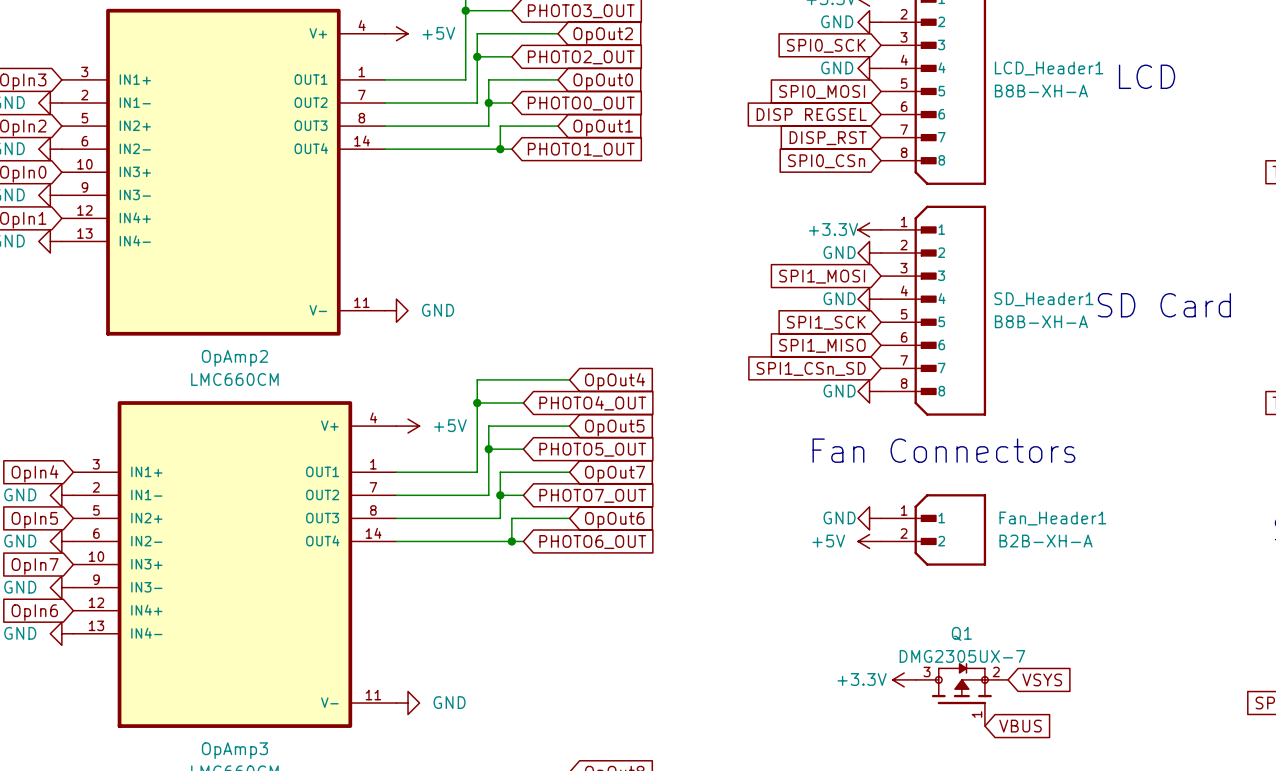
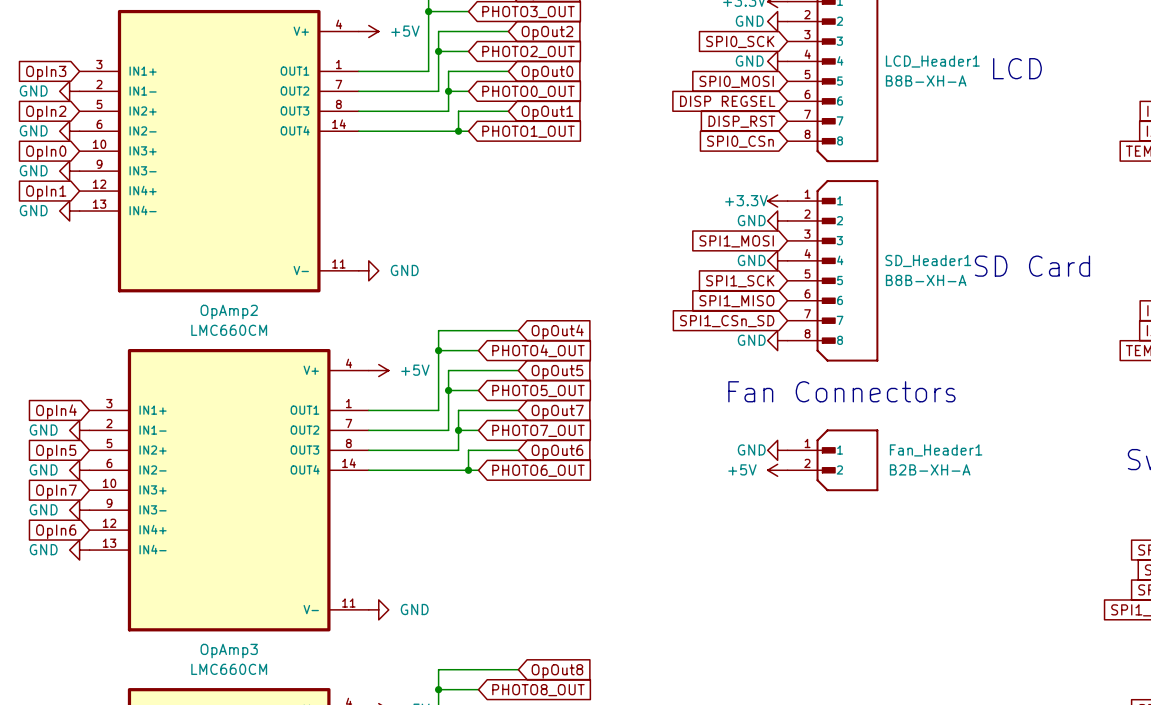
power symbol: +3.3V (904, 679) -> none
global label: VSYS (1042, 679) -> none
Q1: DMG2305UX-7 (961, 694) -> none
global label: VBUS (1020, 726) -> none

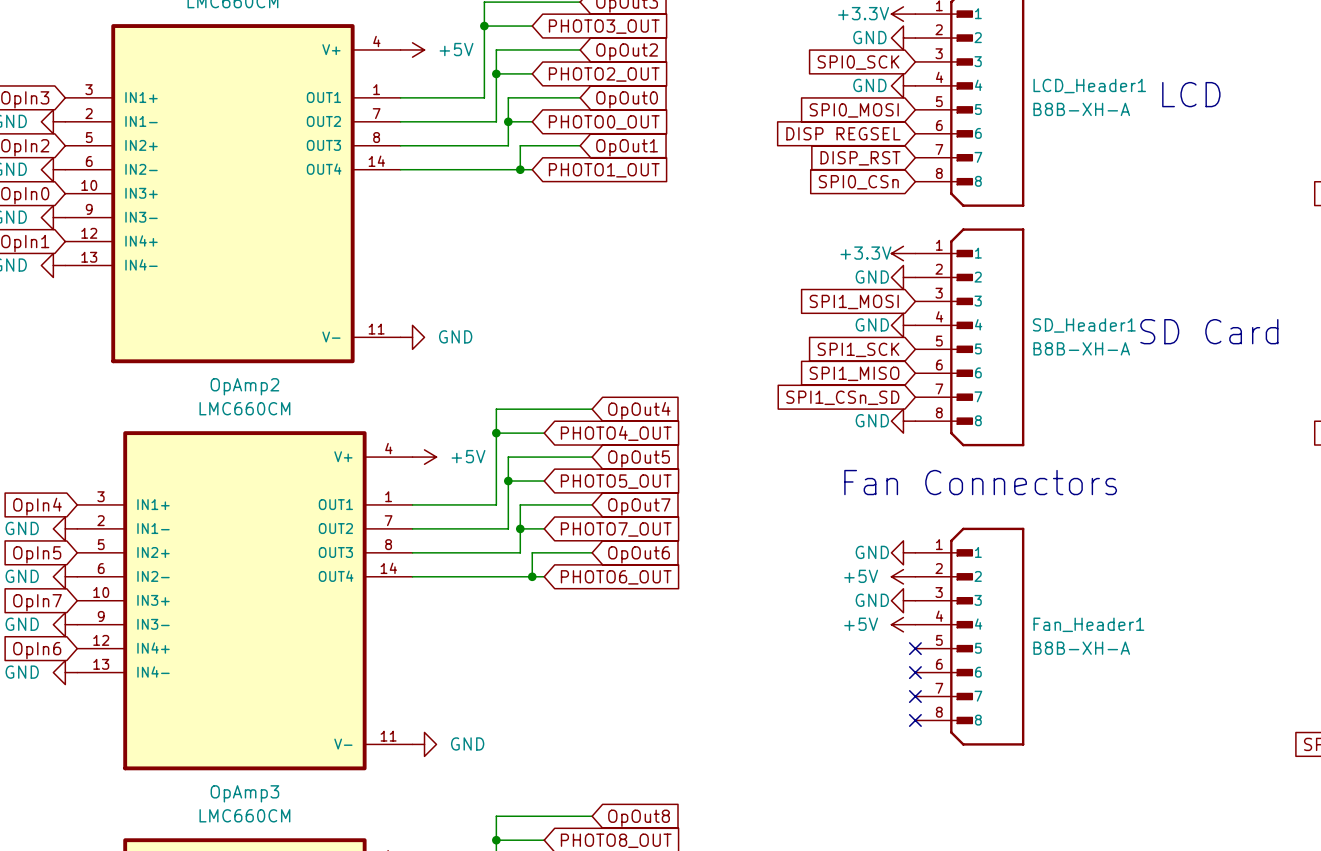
Fan_Header1 symbol: [787, 429, 879, 492] -> [915, 527, 1025, 746]
Fan_Header1 value: B2B-XH-A (930, 469) -> B8B-XH-A (1081, 648)
power symbol: none -> GND (903, 600)
power symbol: none -> +5V (903, 624)
no-connect mark: none -> (915, 648)
no-connect mark: none -> (915, 672)
no-connect mark: none -> (915, 696)
no-connect mark: none -> (915, 720)

